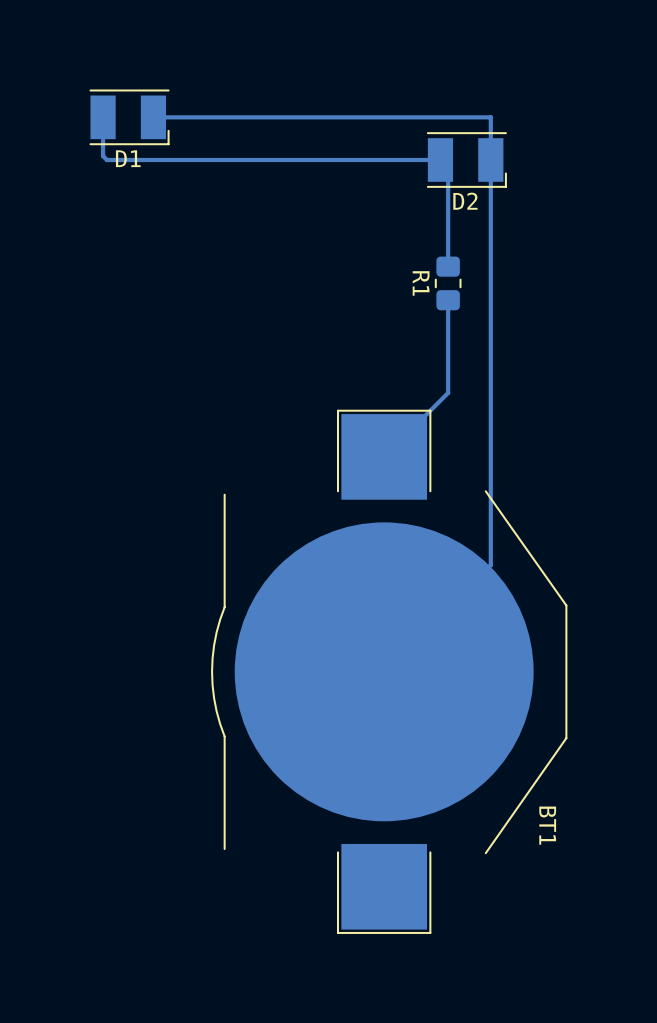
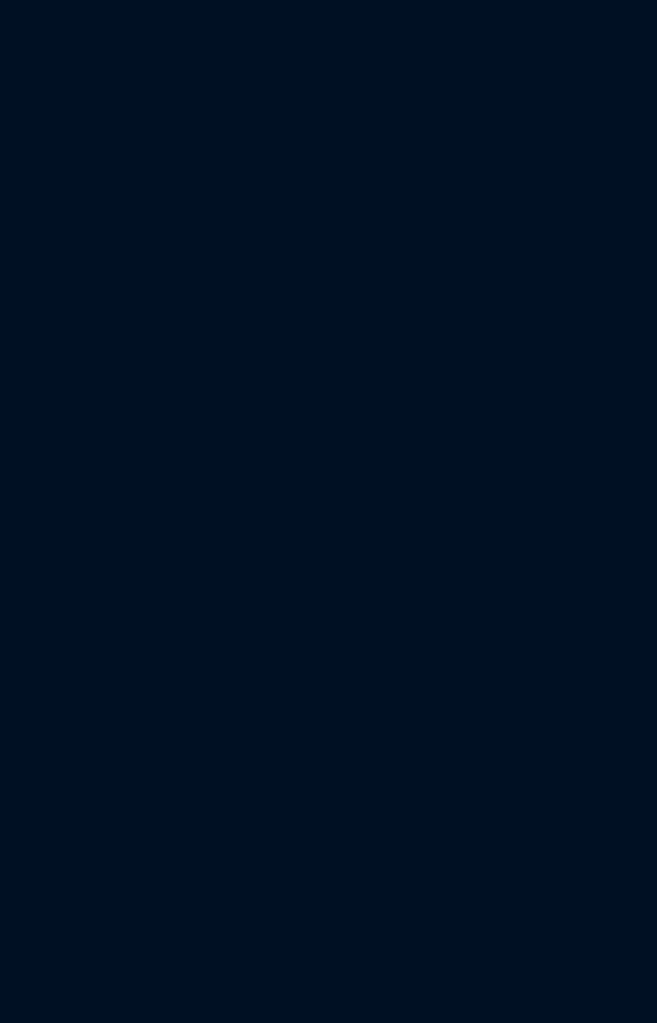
bottom track: (103, 117) (103, 156) (106, 160) (440, 160) (448, 167) (448, 266) -> none
D1: (129, 117) -> none
bottom track: (153, 117) (490, 117) (490, 565) (384, 671) -> none
D2: (466, 160) -> none
R1: (448, 283) -> none
bottom track: (448, 300) (448, 392) (384, 456) -> none
BT1: (389, 671) -> none

